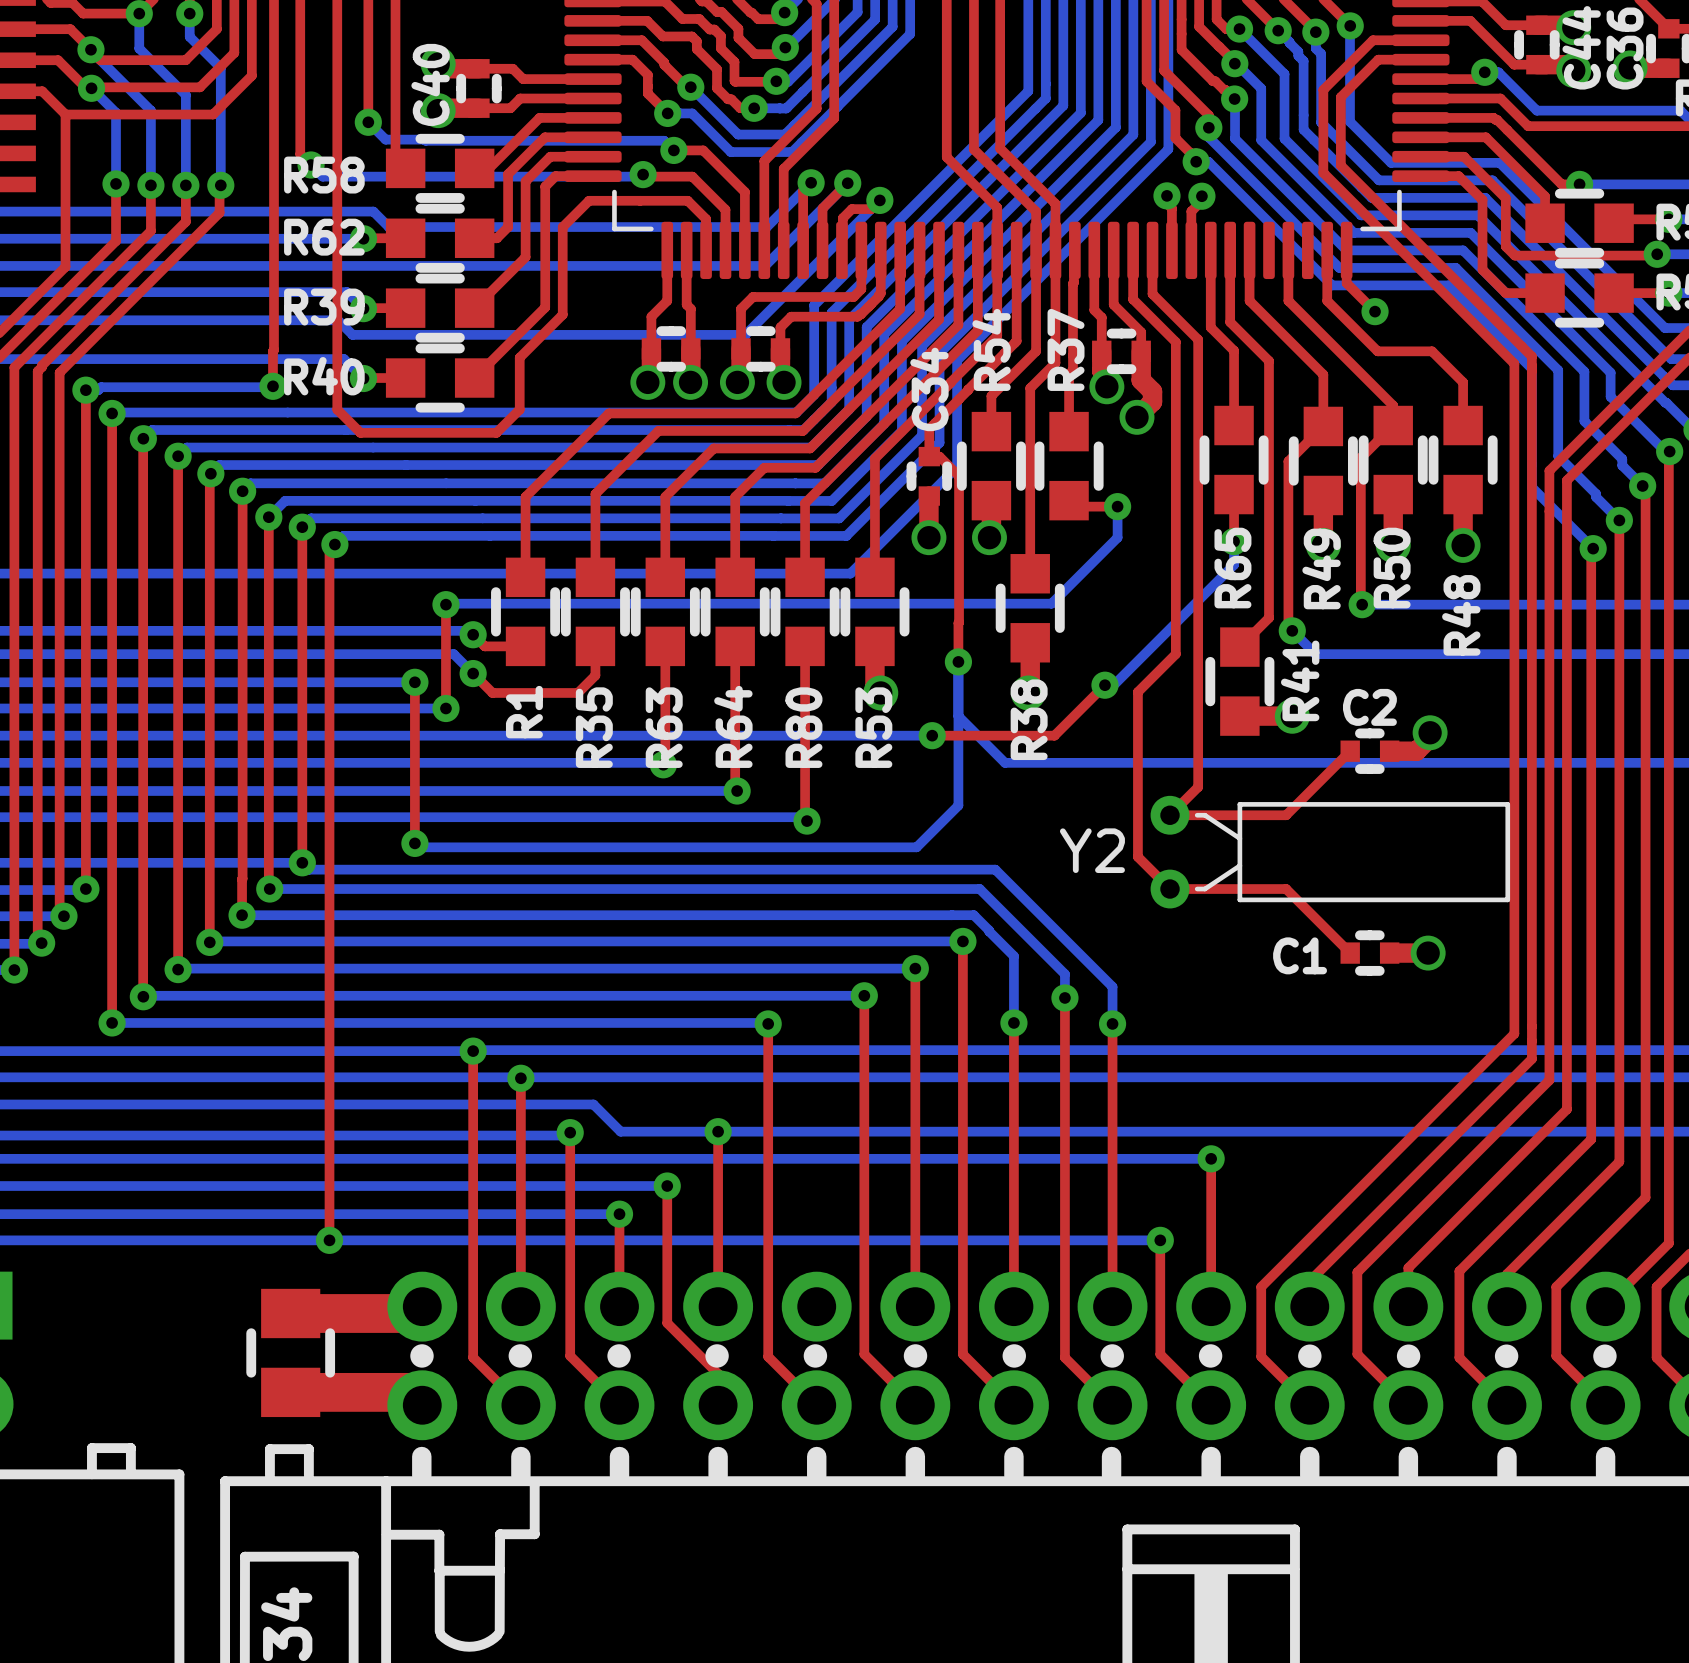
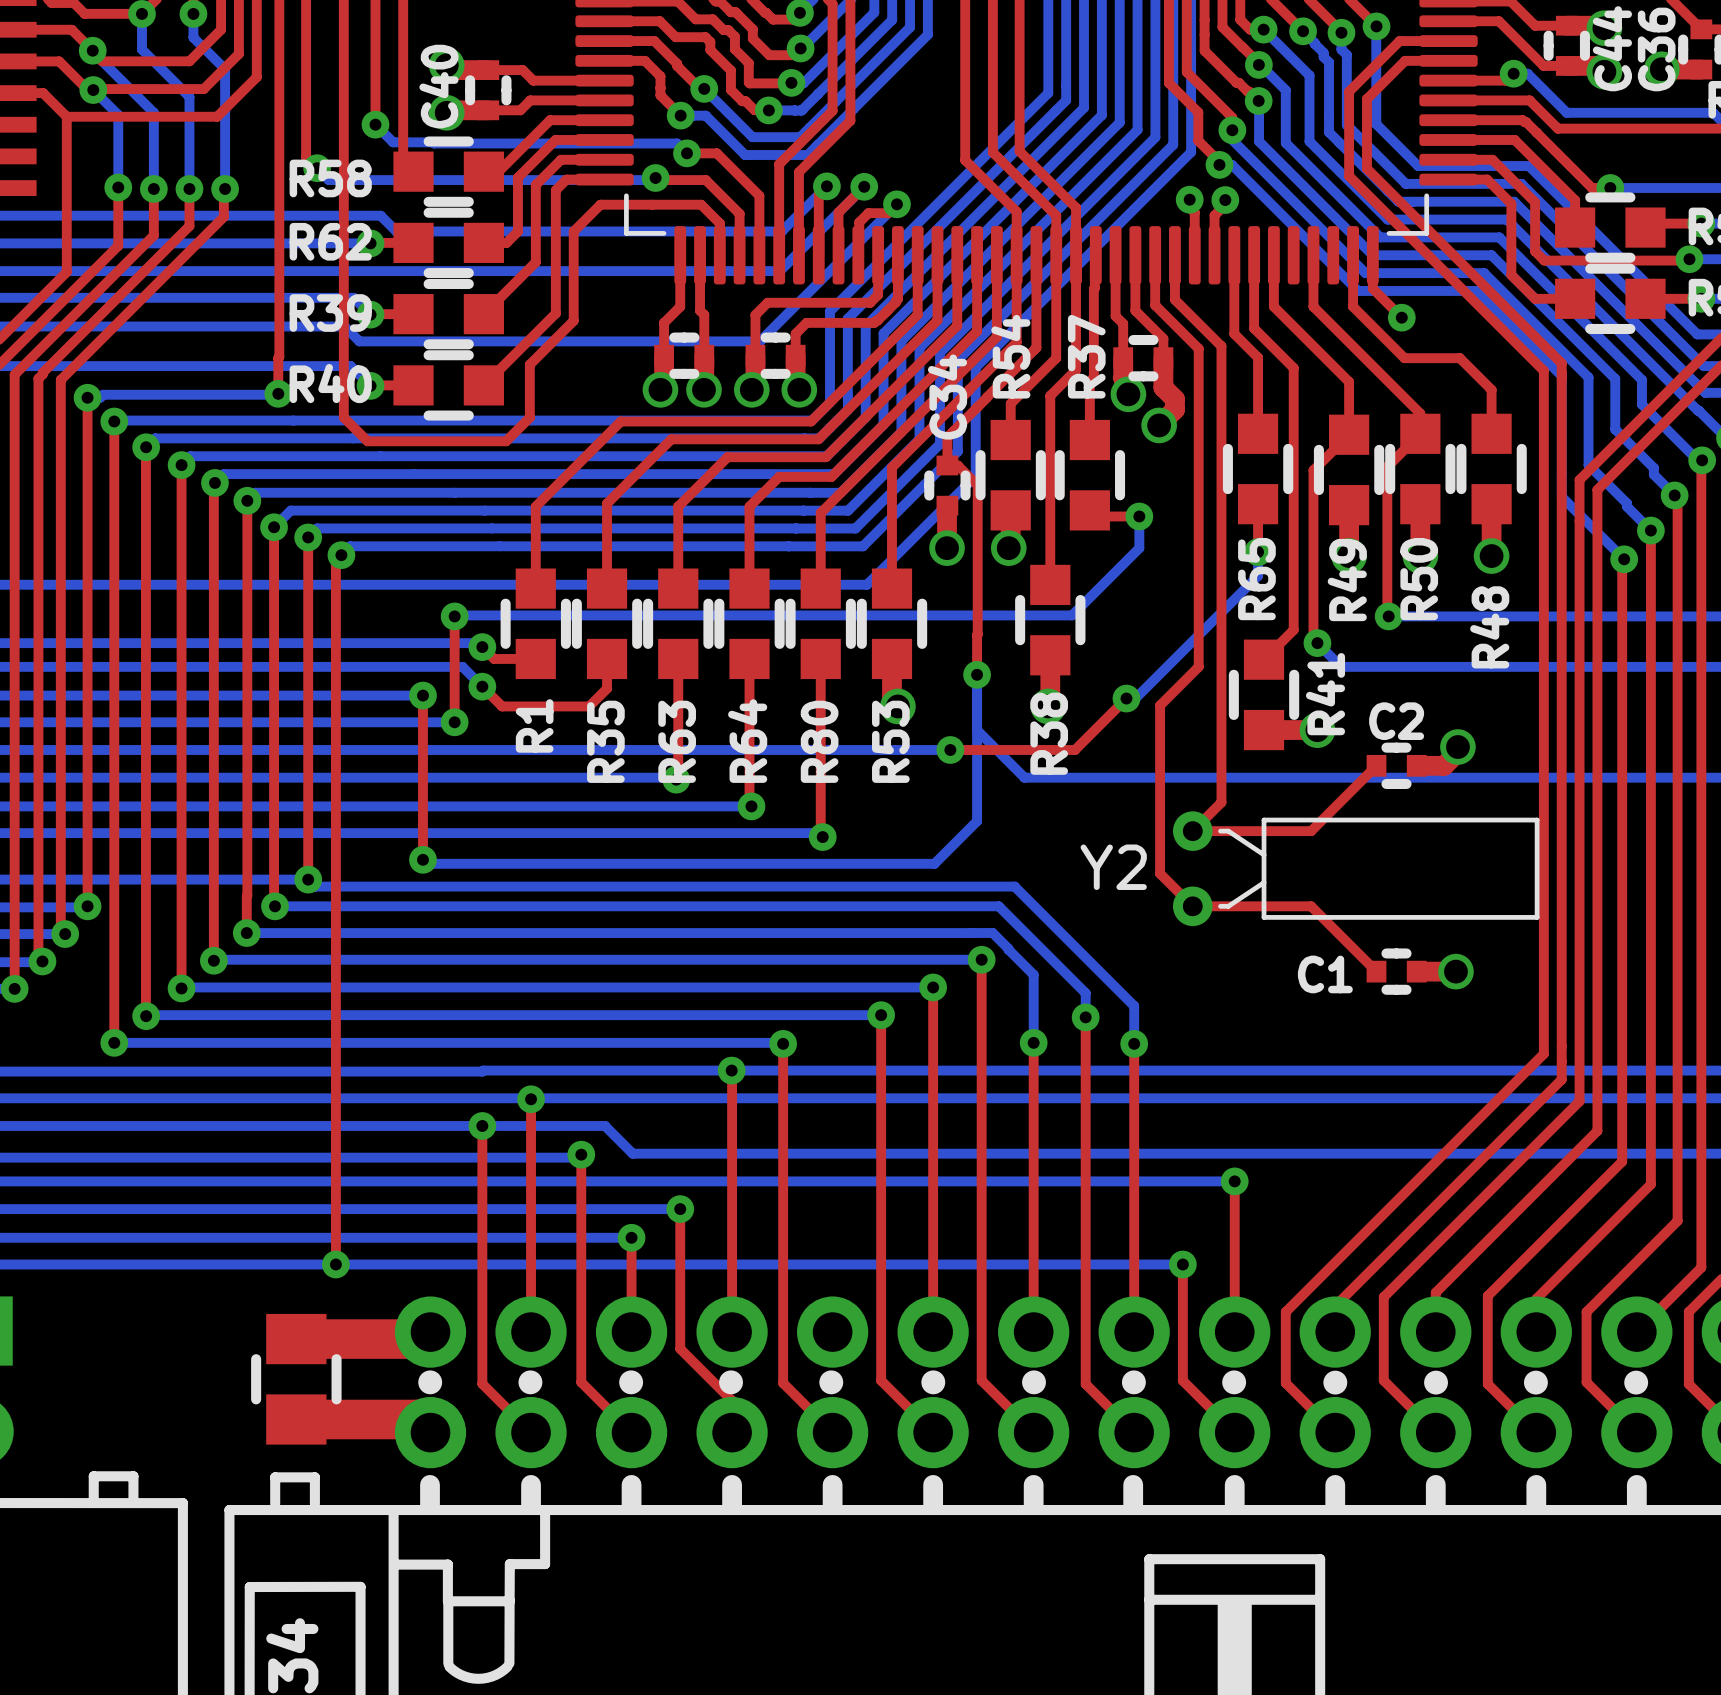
top track: (473, 1051) (473, 1104) -> none
via position: (473, 1051) -> (482, 1125)
top track: none -> (732, 1074) (732, 1153)
via position: (718, 1131) -> (731, 1070)

